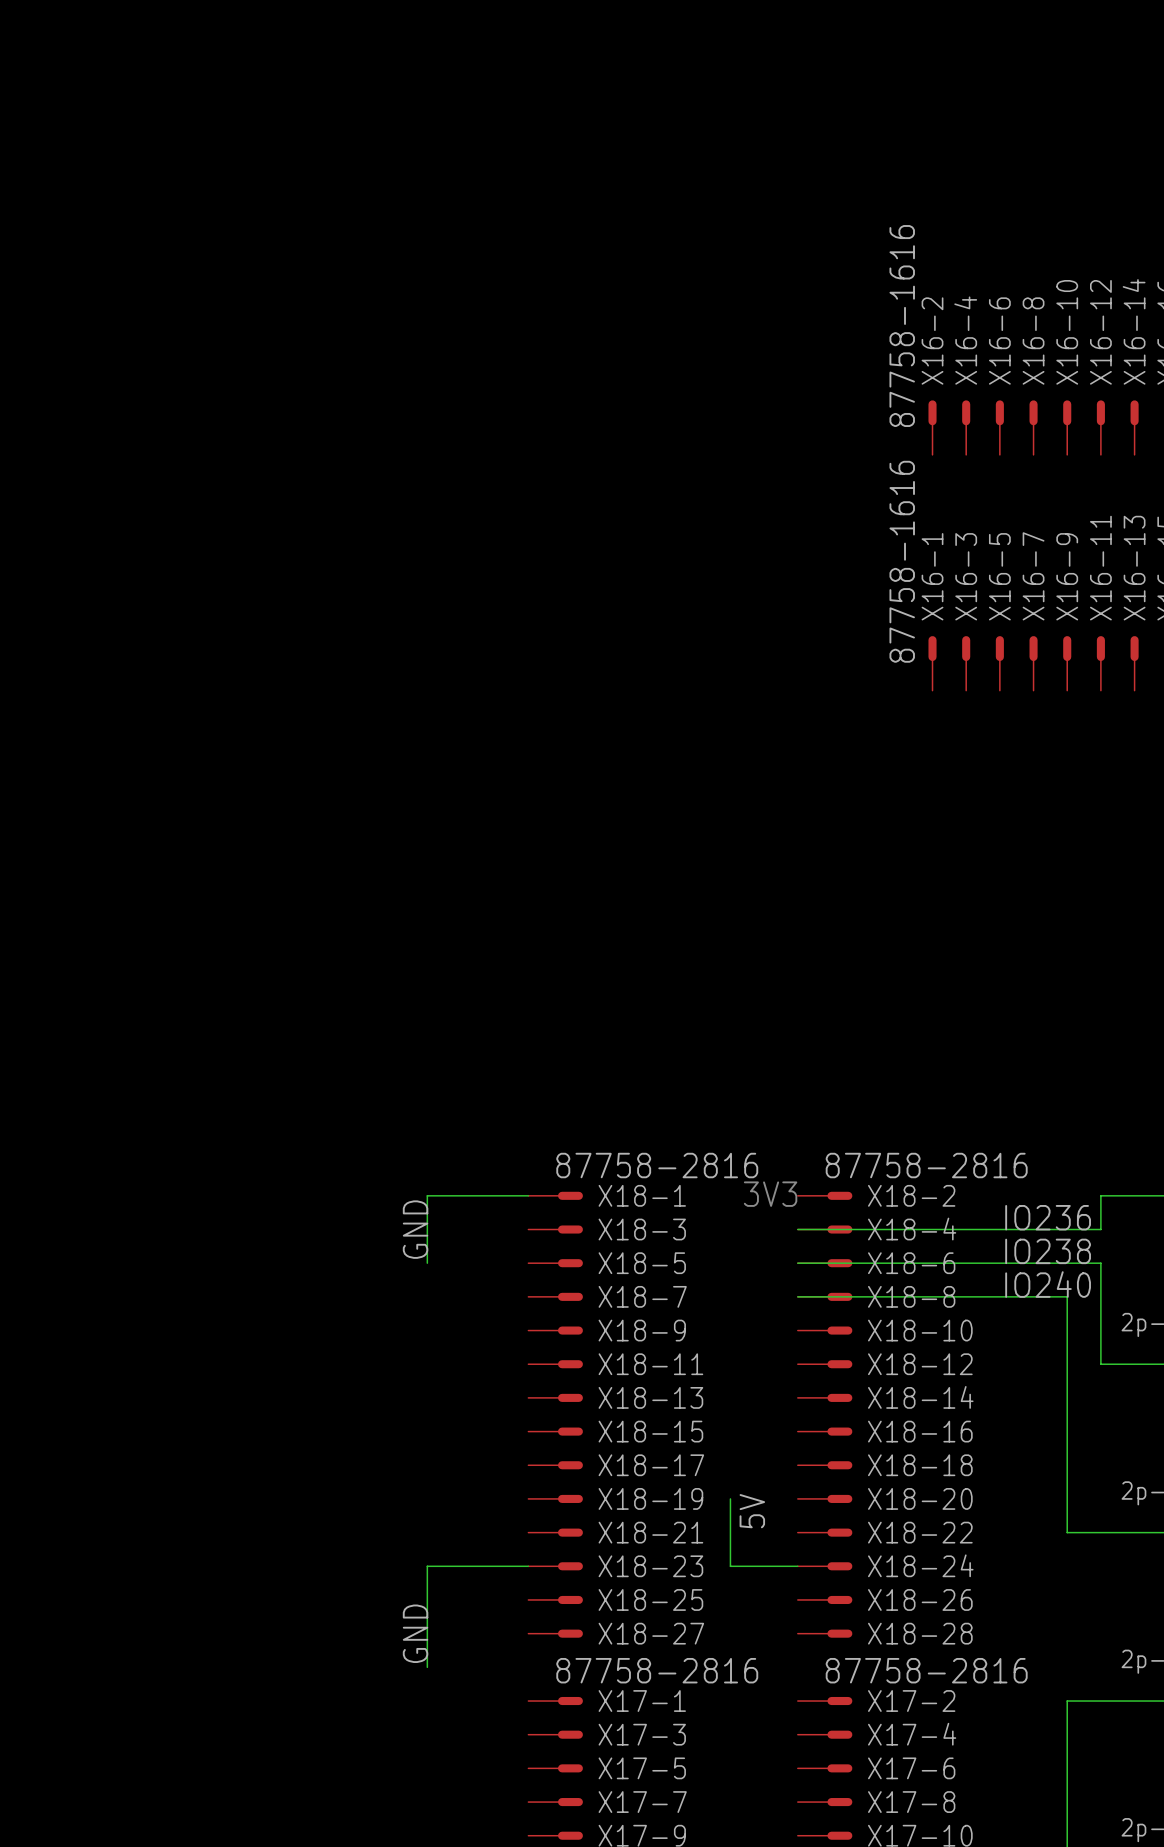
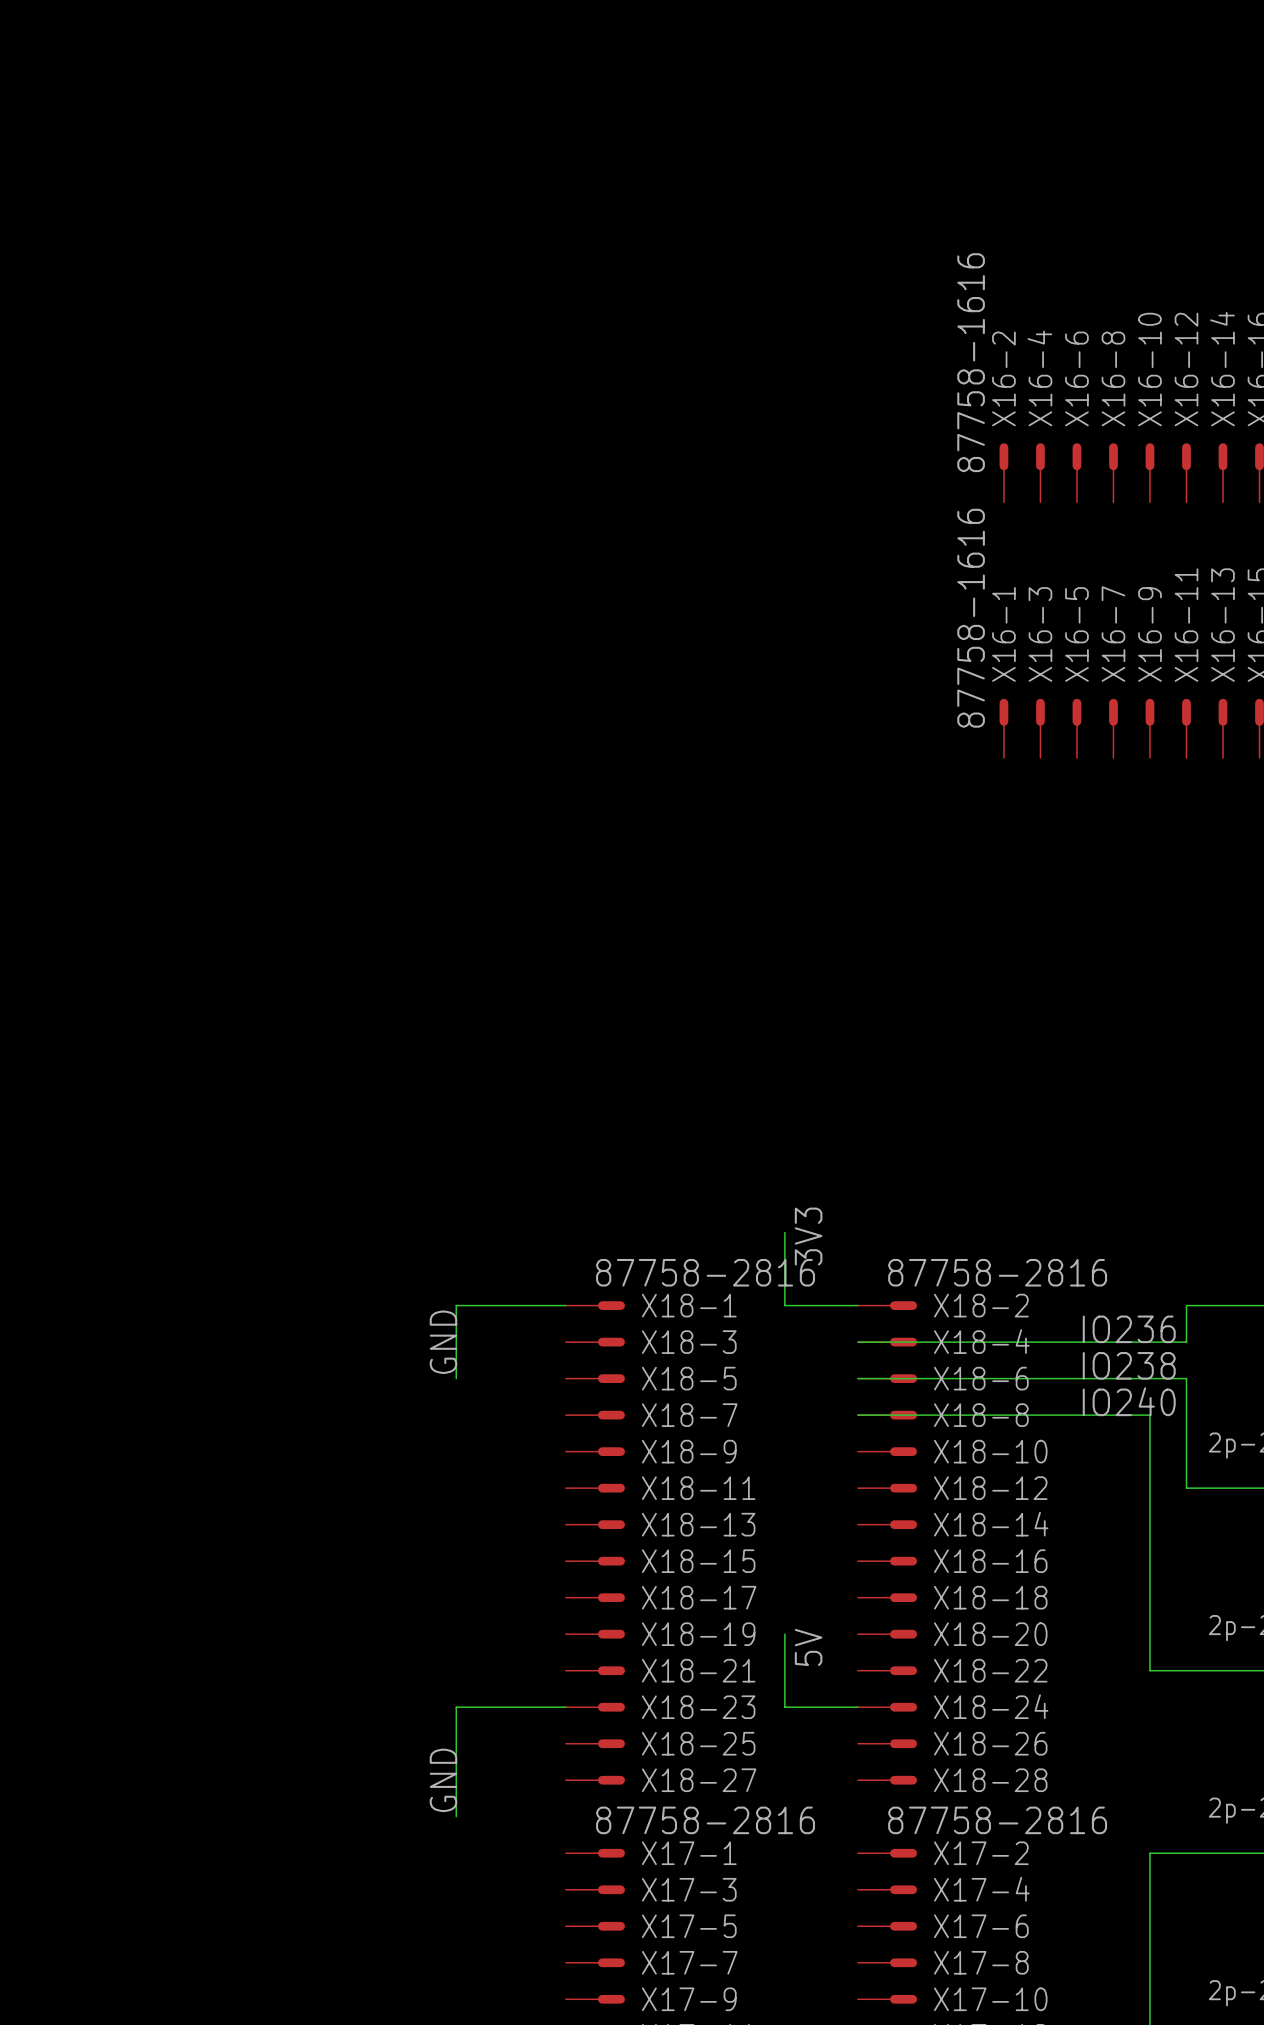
wire: none -> (784, 1232) (784, 1305) (857, 1305)
label: none -> 3V3 (808, 1236)
text: 3V3 (770, 1194) -> none

